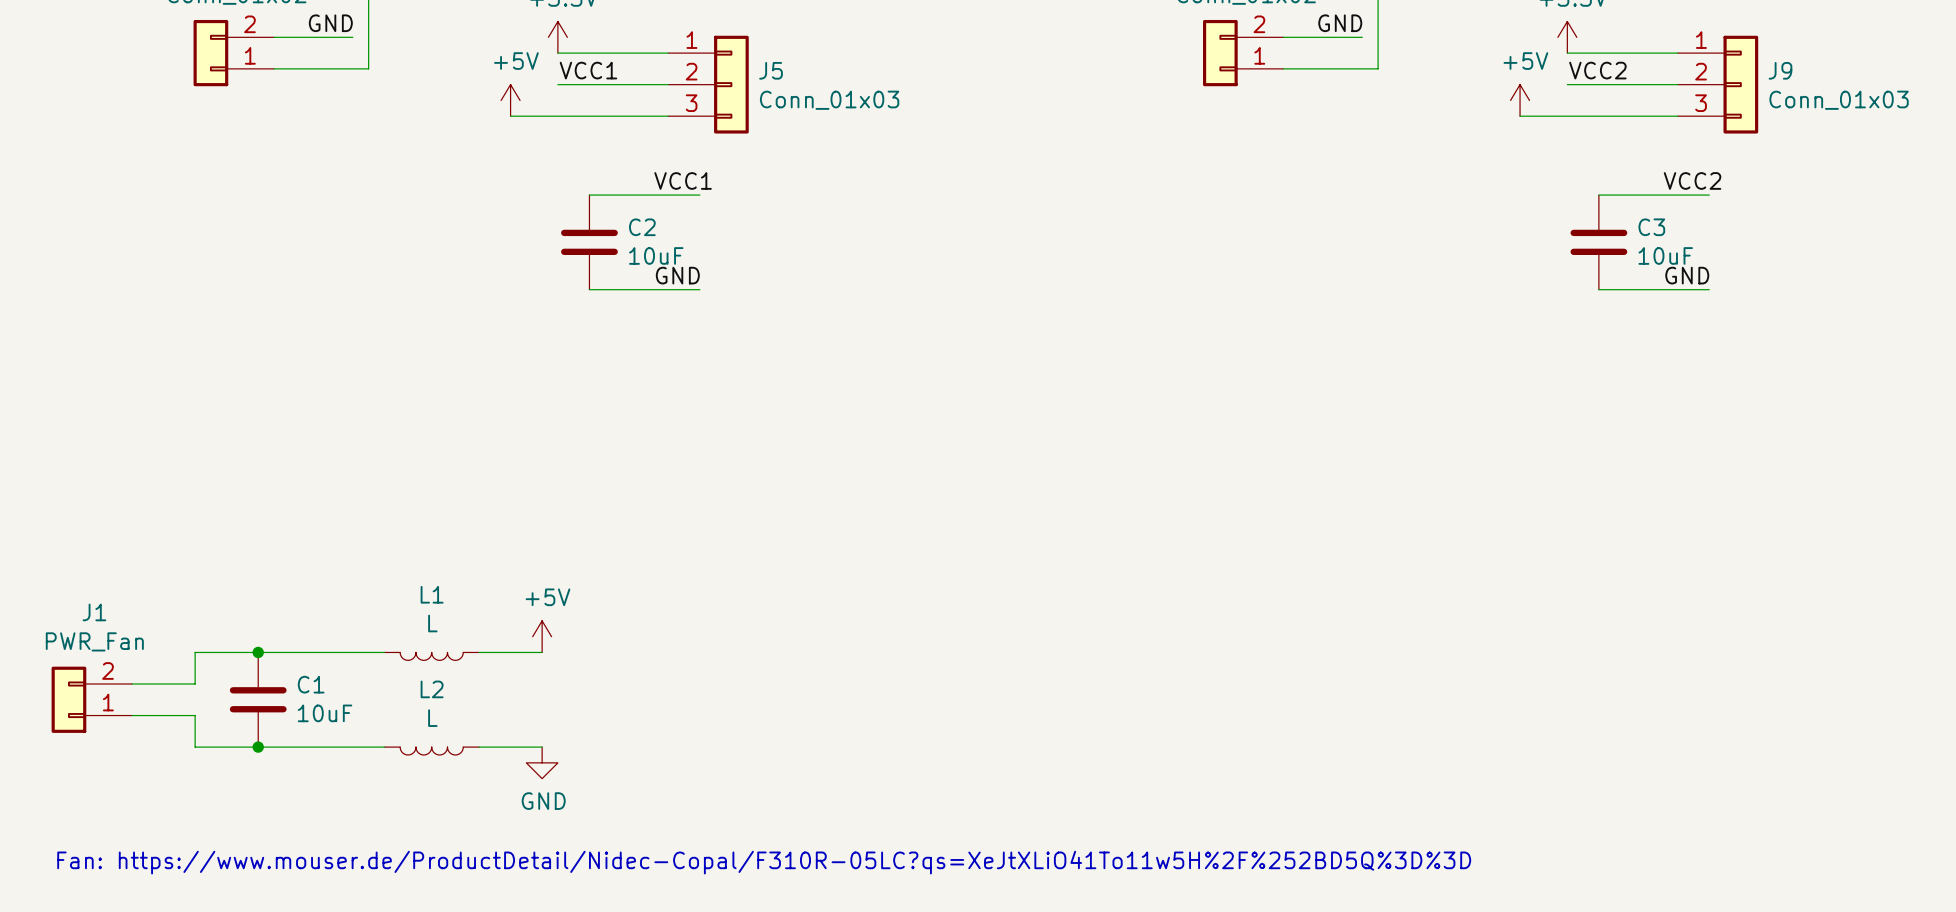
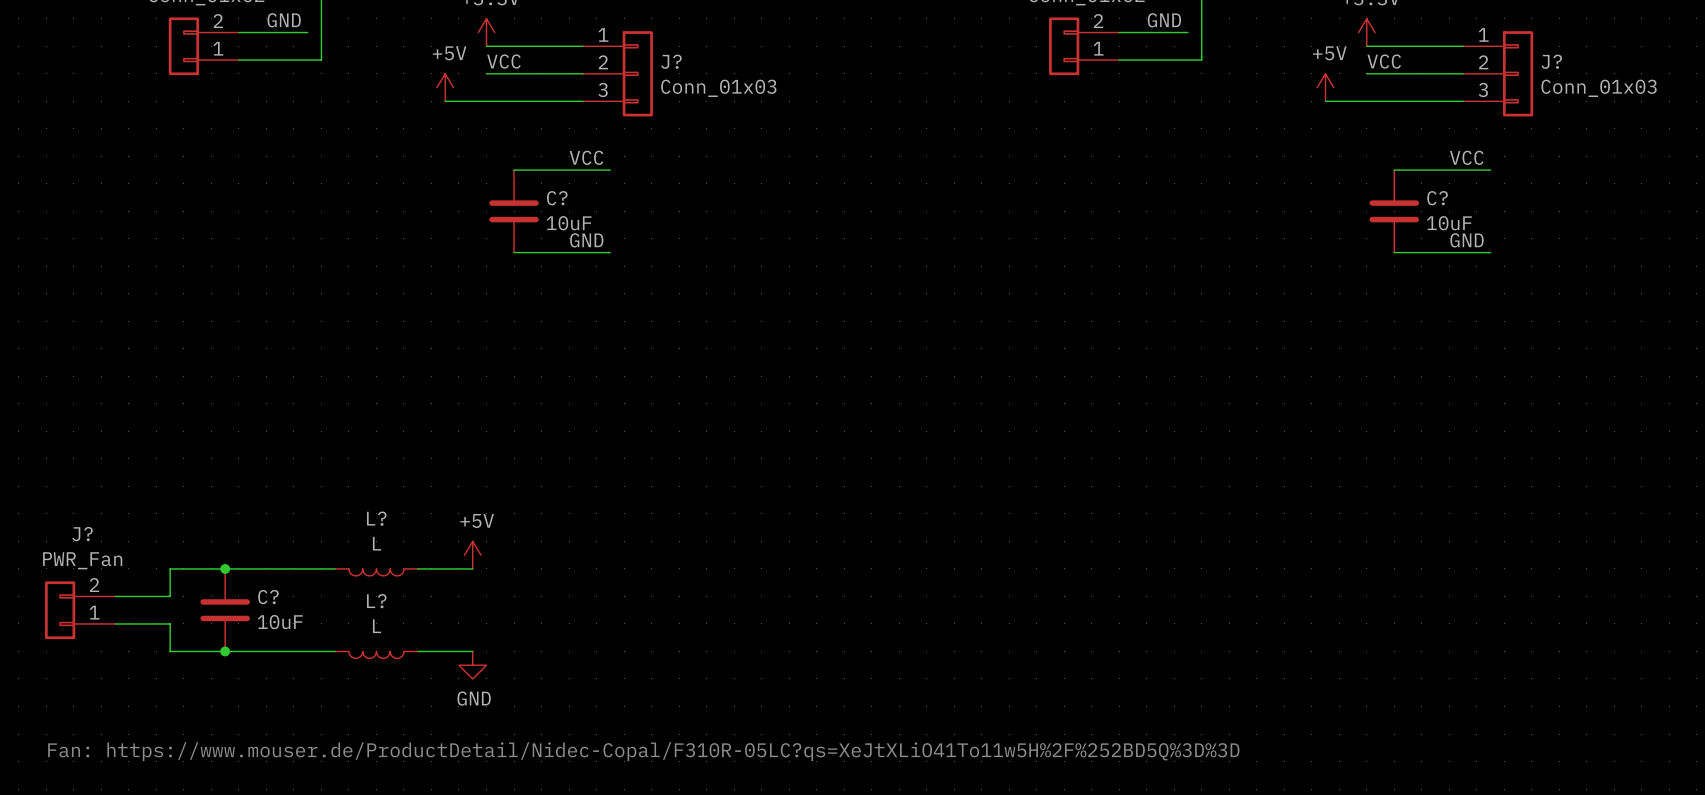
label: VCC1 (588, 70) -> VCC (503, 61)
J5 name: J5 (771, 70) -> J? (671, 61)
label: VCC2 (1597, 70) -> VCC (1384, 61)
J9 name: J9 (1780, 70) -> J? (1551, 61)
label: VCC1 (683, 180) -> VCC (586, 157)
label: VCC2 (1692, 180) -> VCC (1466, 157)
C2 name: C2 (642, 227) -> C? (557, 198)
C3 name: C3 (1651, 227) -> C? (1437, 198)
L1 name: L1 (432, 594) -> L? (376, 518)
J1 name: J1 (94, 612) -> J? (82, 534)
C1 name: C1 (311, 684) -> C? (268, 597)
L2 name: L2 (432, 689) -> L? (376, 601)

